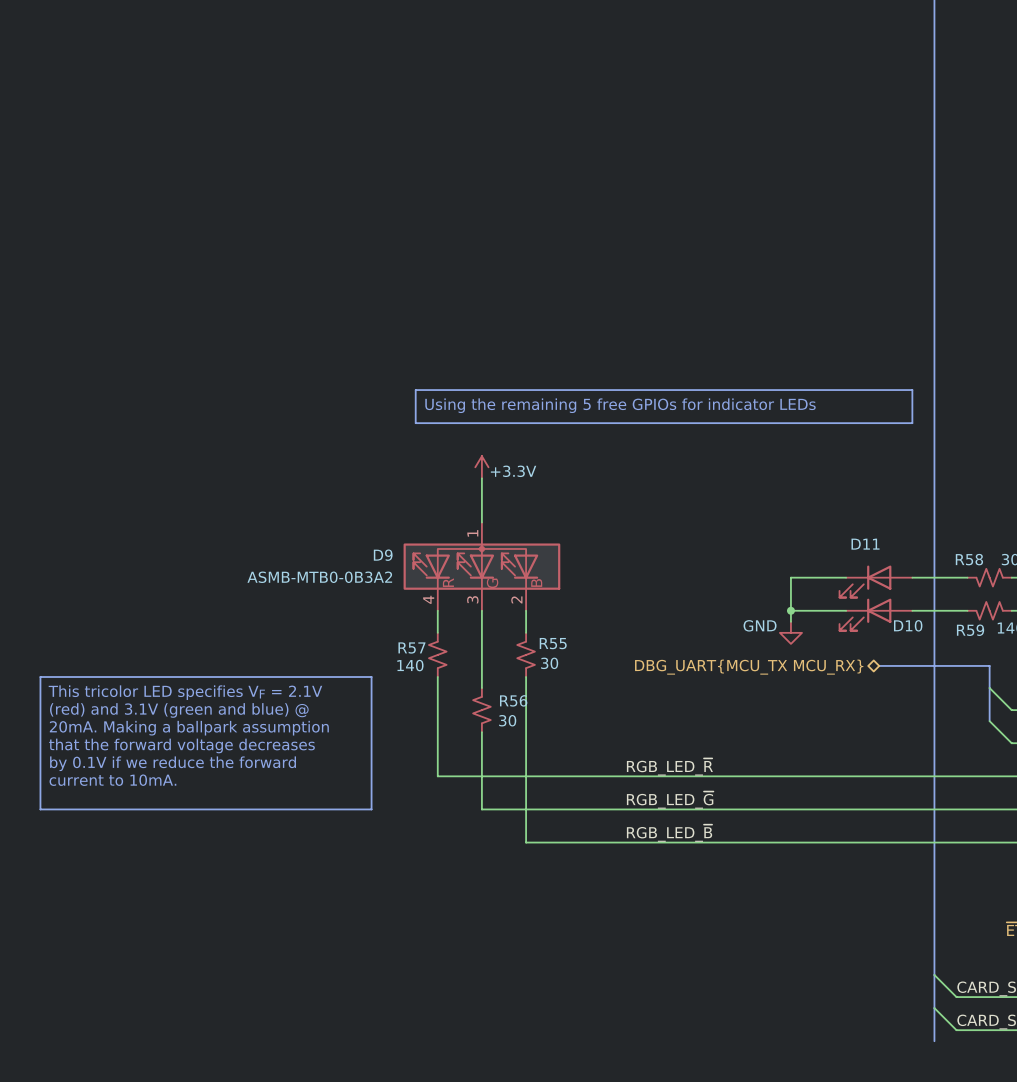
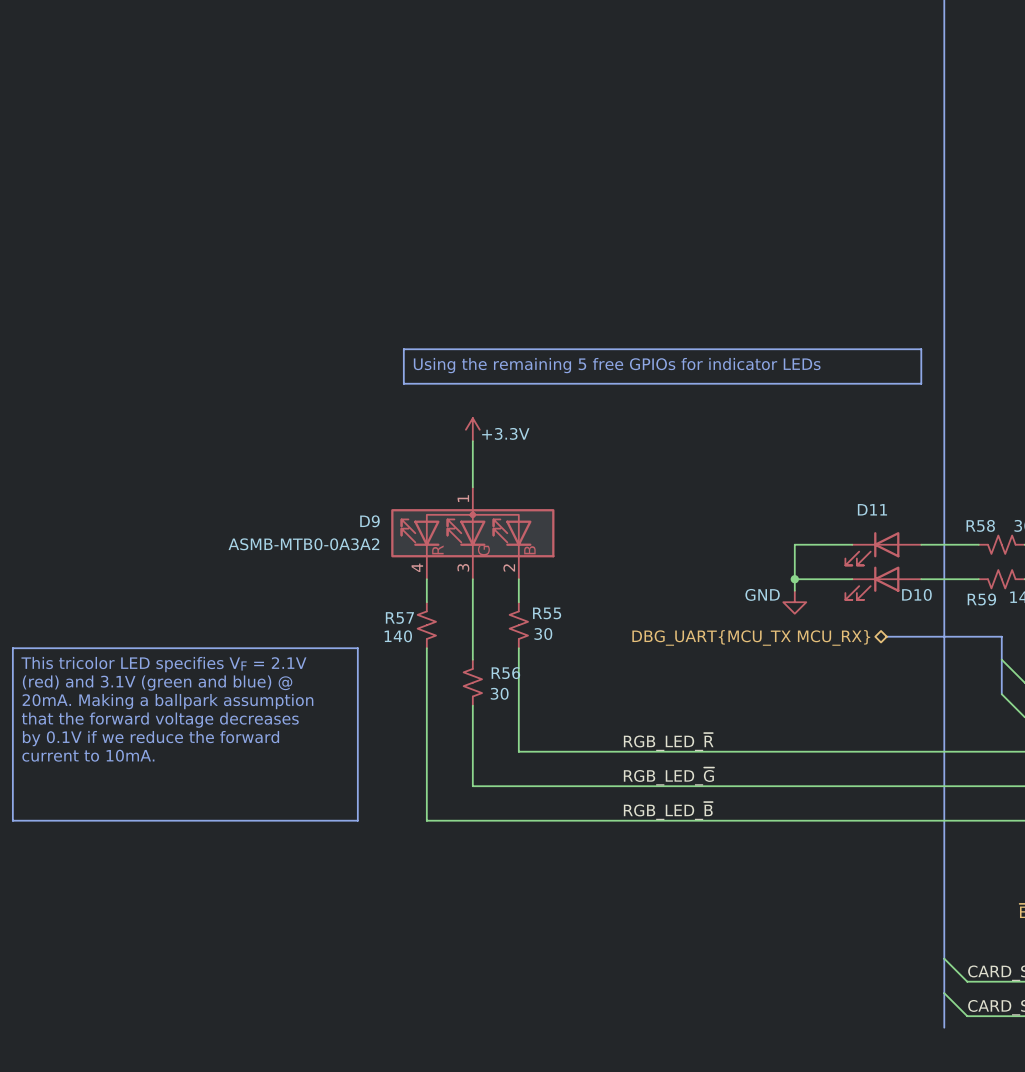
D9 value: ASMB-MTB0-0B3A2 (319, 577) -> ASMB-MTB0-0A3A2 (303, 544)
wire: (437, 776) (526, 776) (526, 842) -> (426, 751) (426, 820) (518, 820)
line: (40, 809) (371, 809) -> (12, 786) (12, 820) (357, 820) (357, 786)

